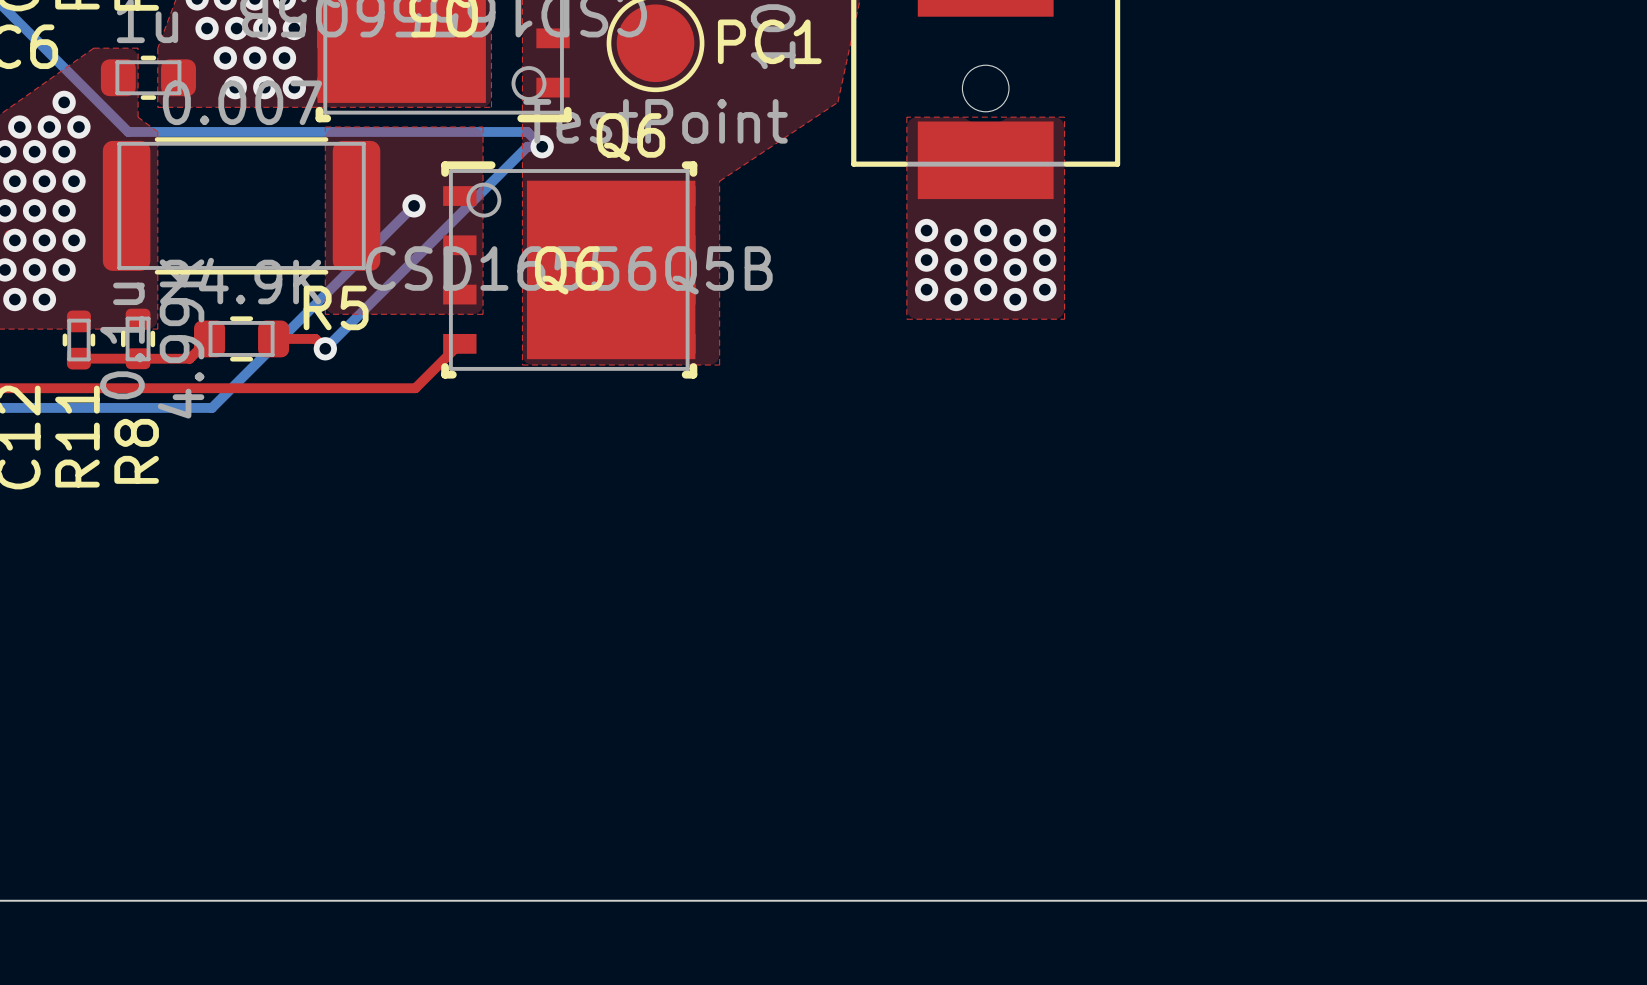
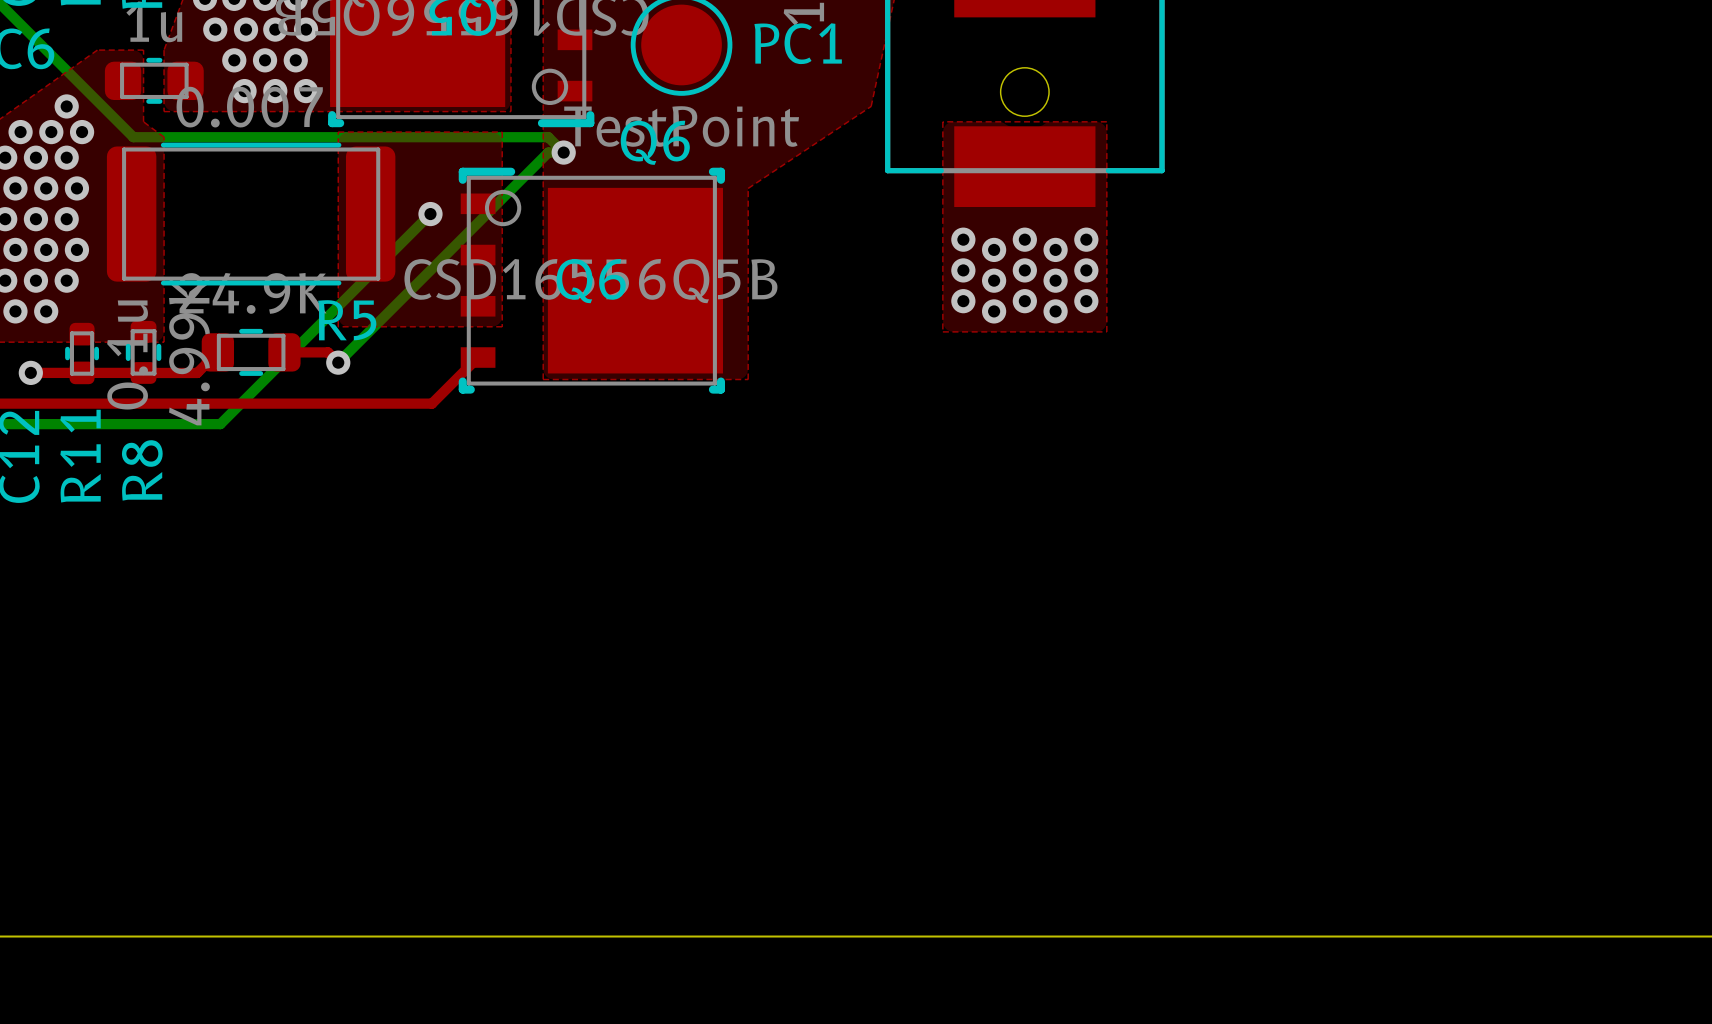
top track: none -> (30, 372) (82, 372)
via: none -> (30, 372)

